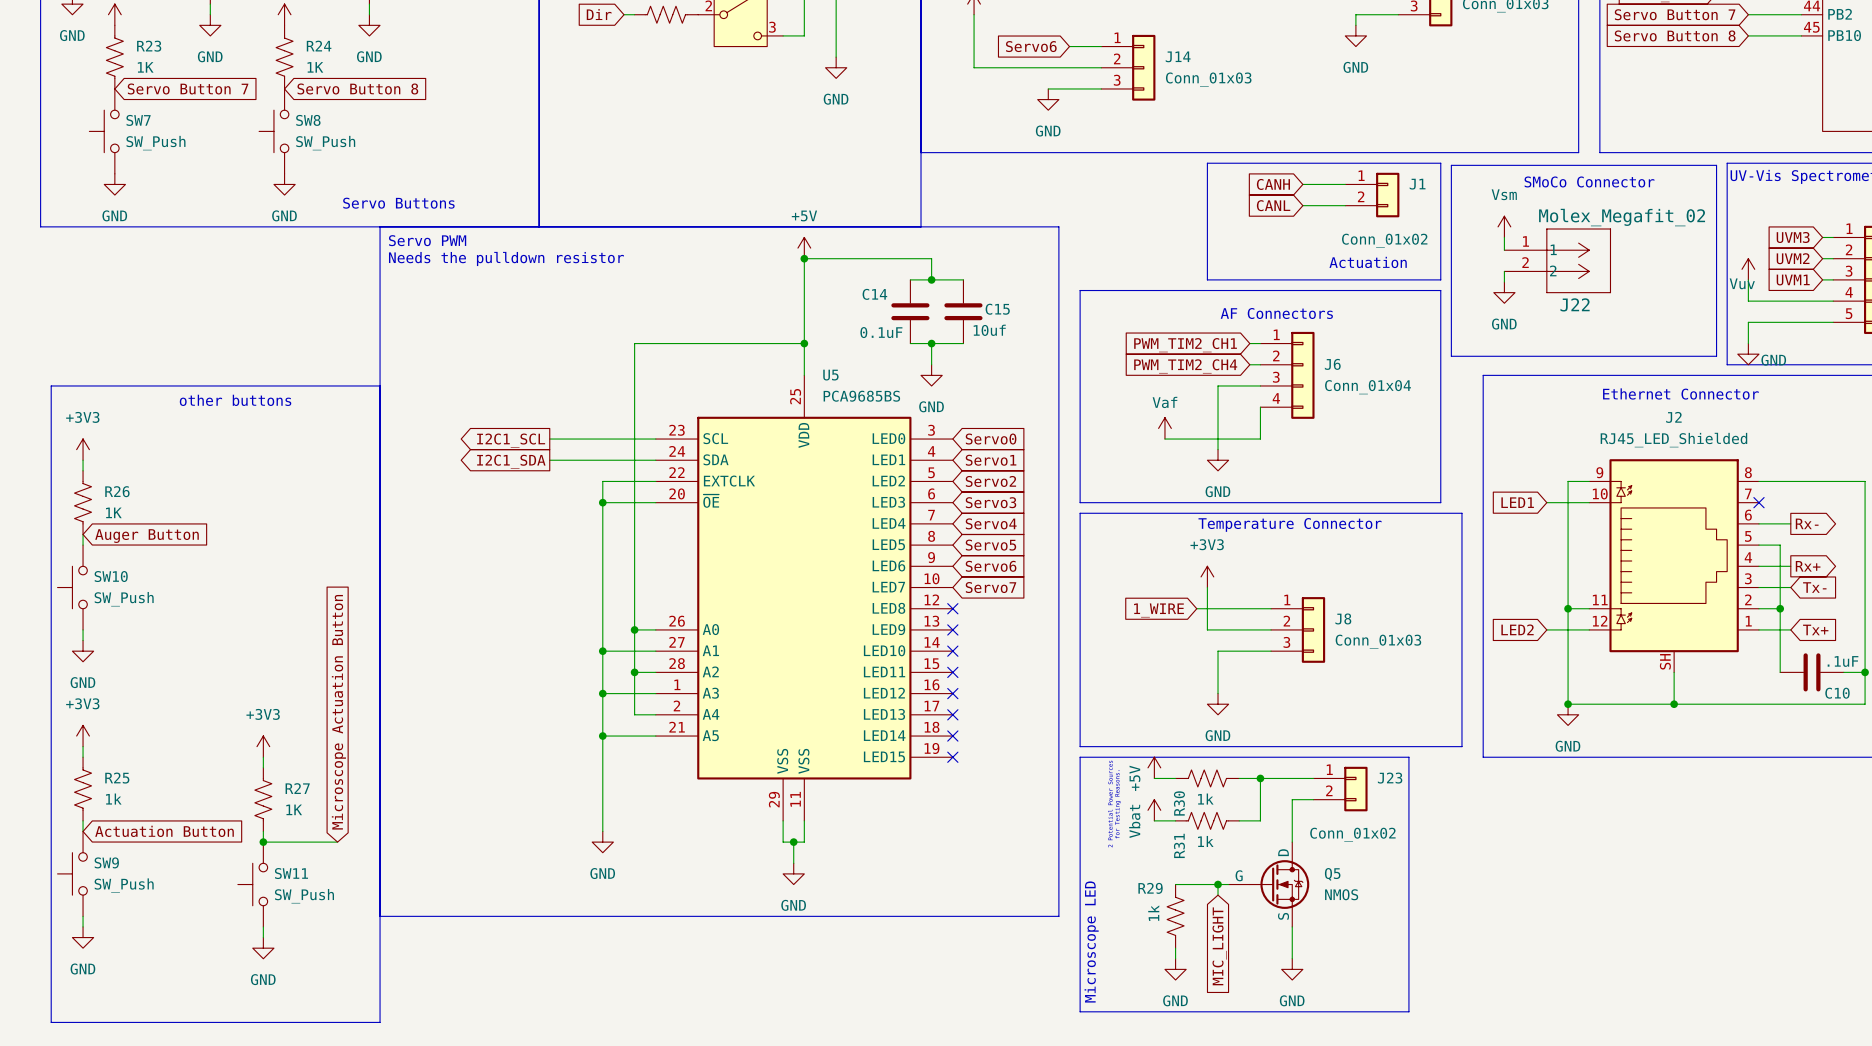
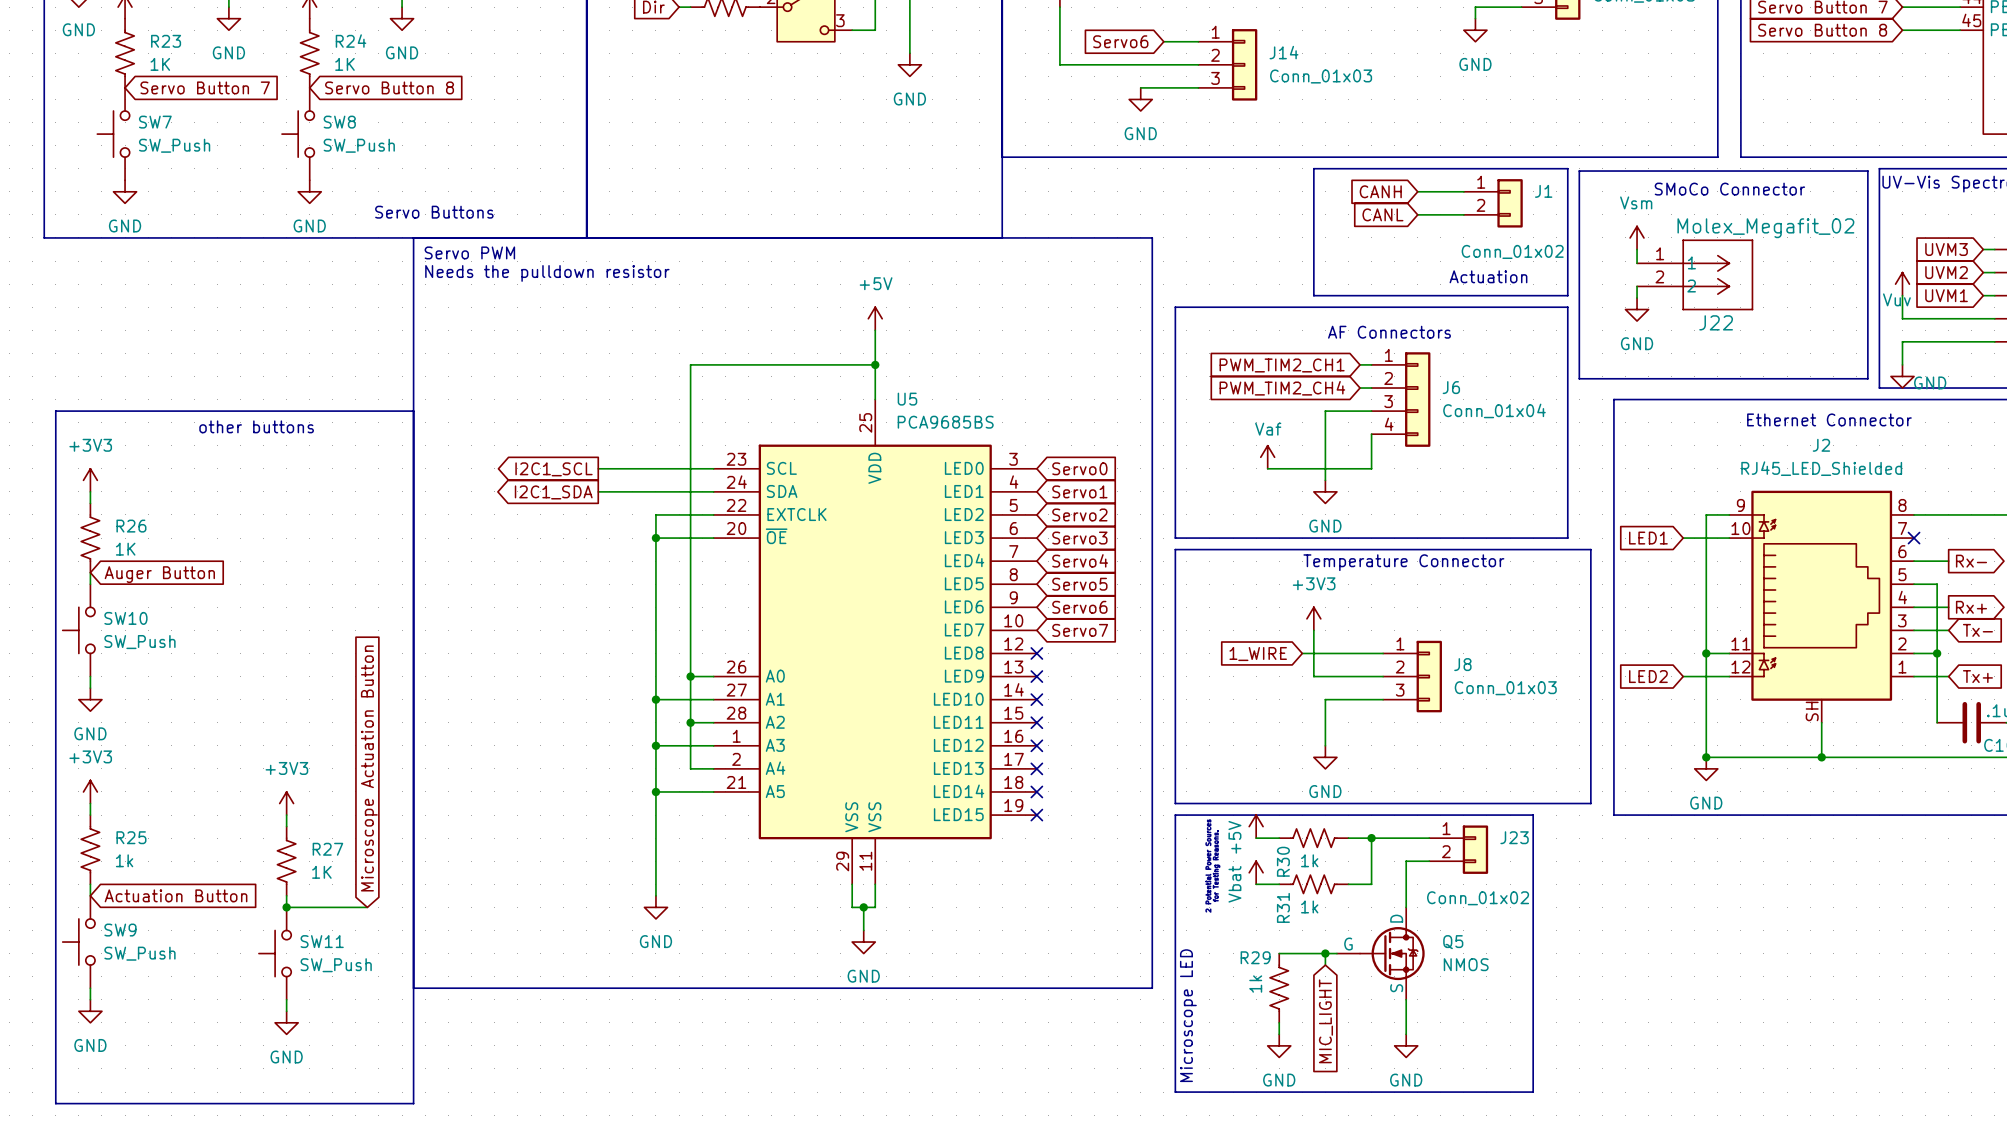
power symbol position: +5V (804, 248) -> +5V (875, 318)
junction: (804, 258) -> none
wire: (910, 279) (963, 279) -> none
wire: (931, 279) (931, 258) (804, 258) (804, 311) -> none
junction: (931, 279) -> none
C14: 0.1uF (910, 311) -> none
C15: 10uf (963, 311) -> none
wire: (910, 343) (963, 343) -> none
wire: (931, 343) (931, 364) -> none
junction: (931, 343) -> none
power symbol: GND (931, 375) -> none

